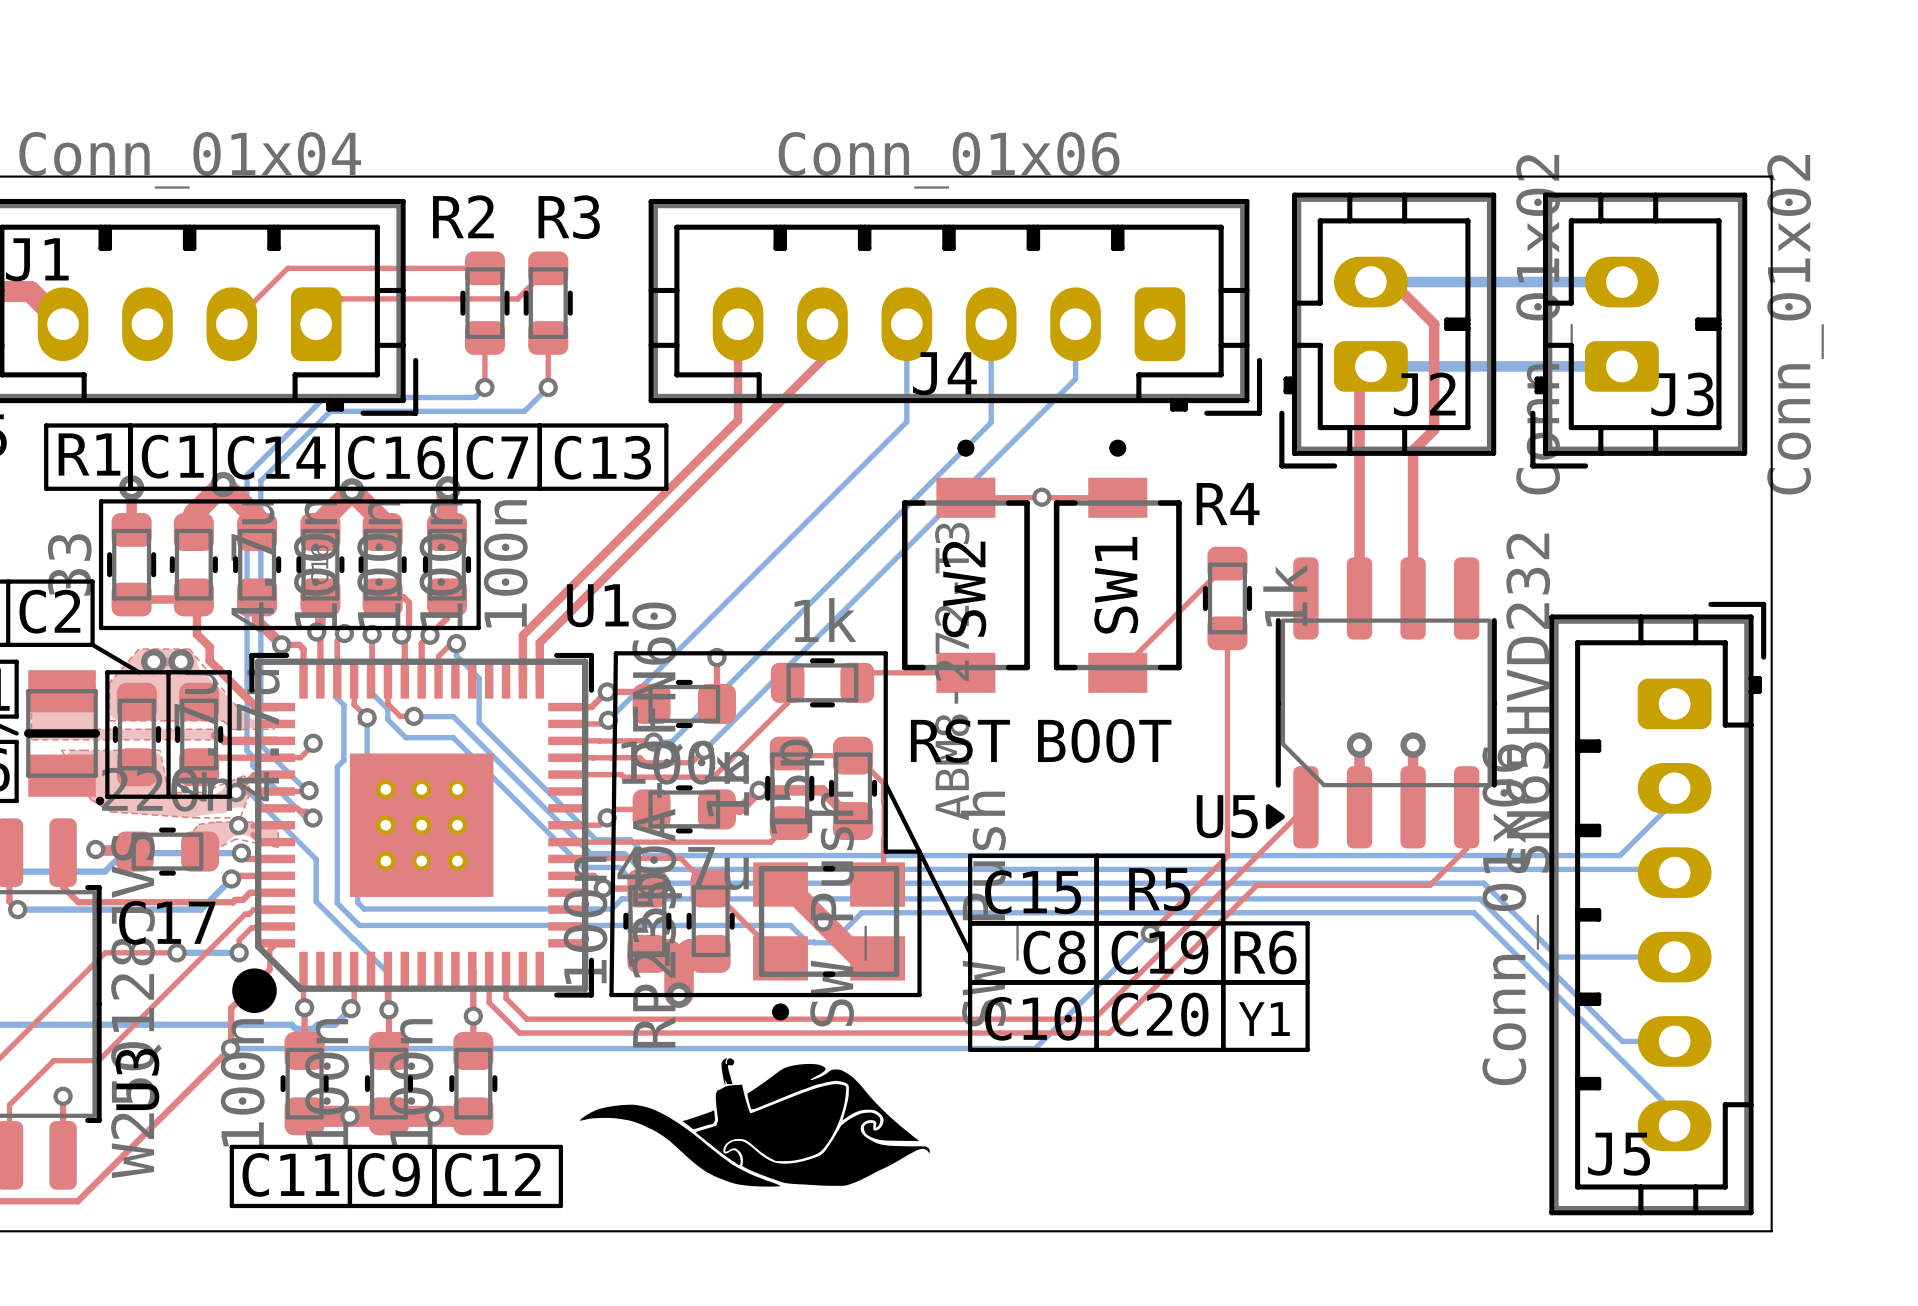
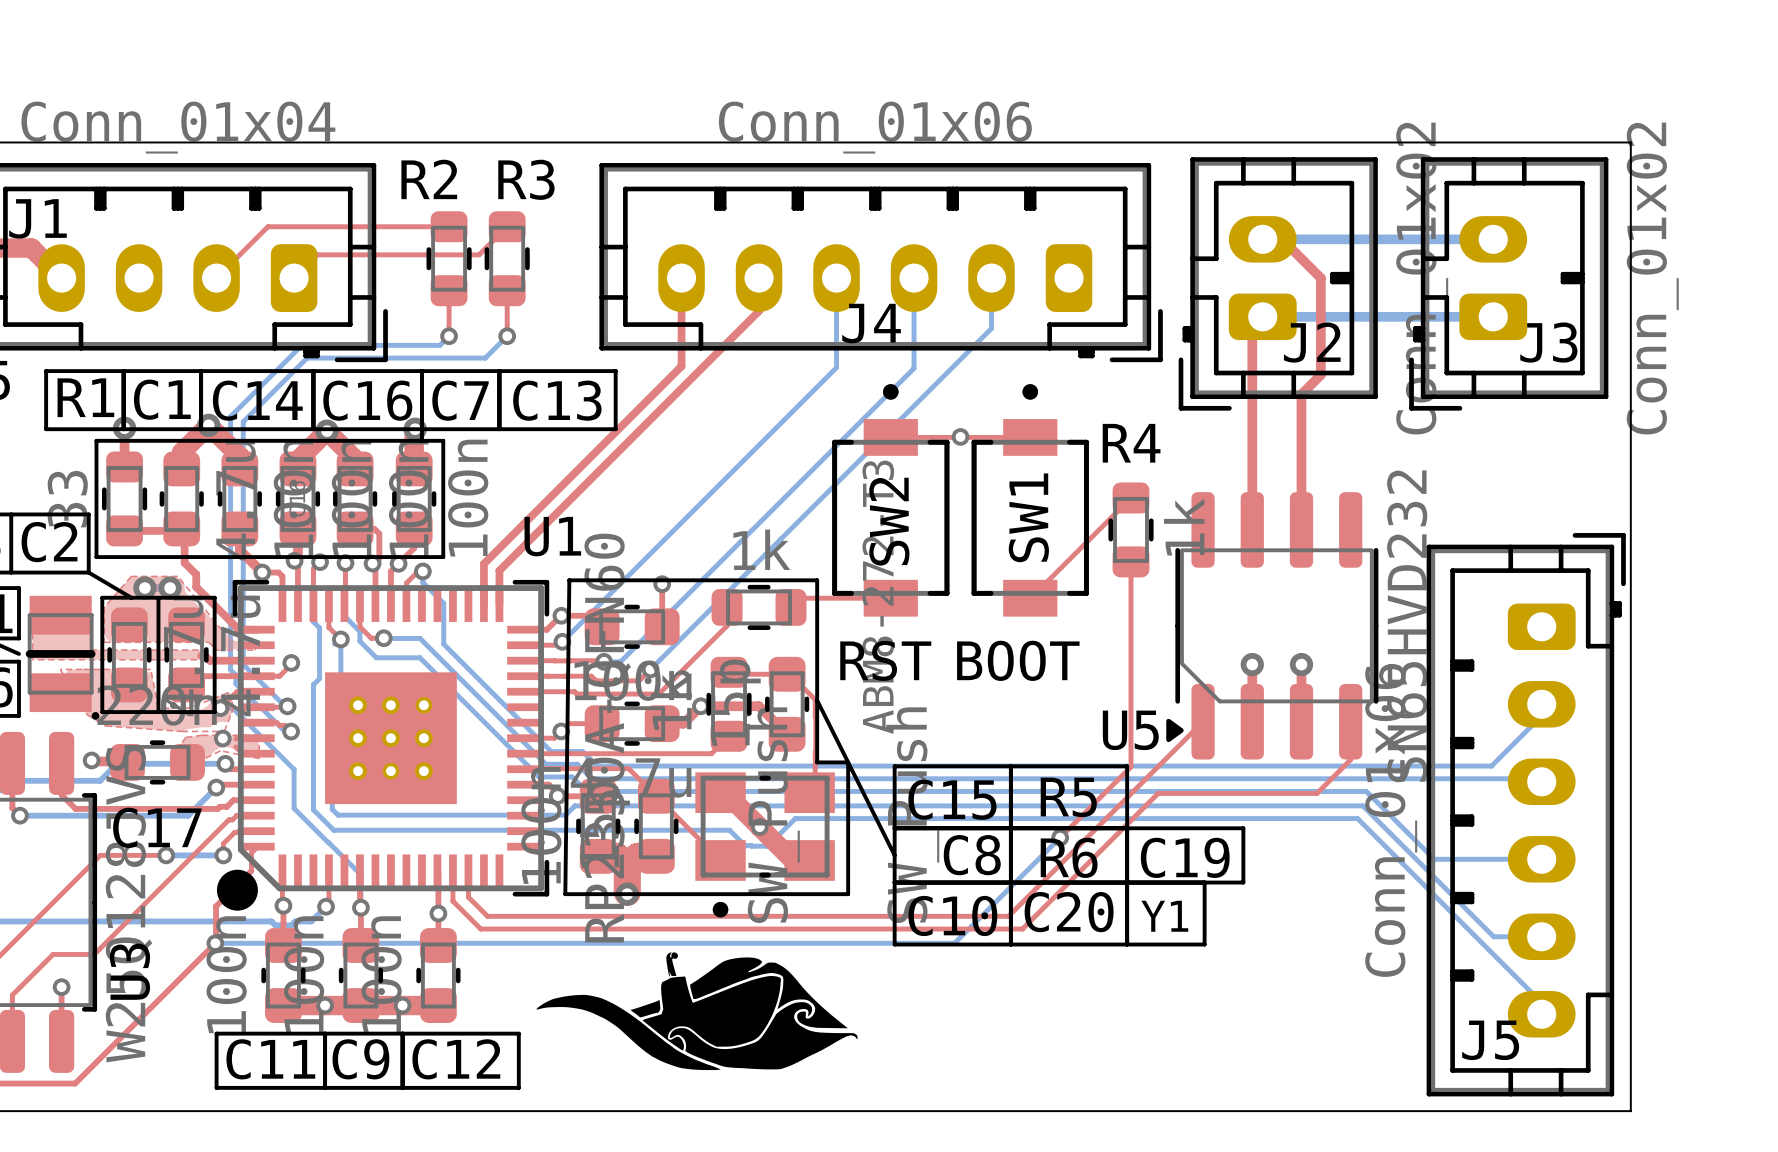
line: (1307, 923) (1307, 982) -> (1204, 828) (1243, 828) (1243, 882) (1204, 882)
C19 name position: C19 (1159, 952) -> C19 (1185, 857)
R6 name position: R6 (1265, 952) -> R6 (1069, 857)

